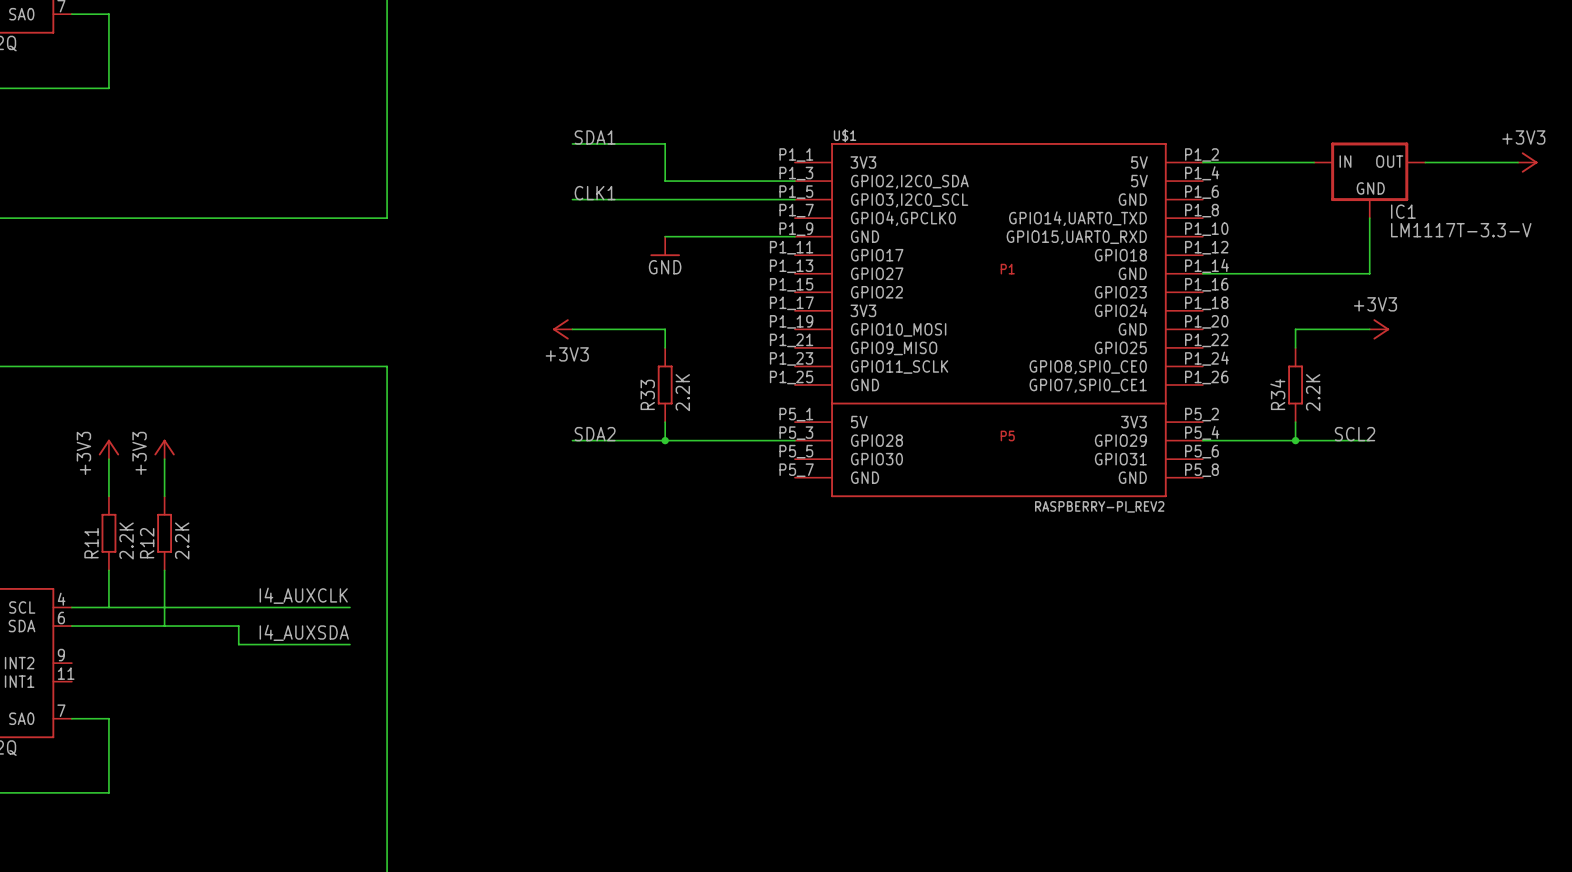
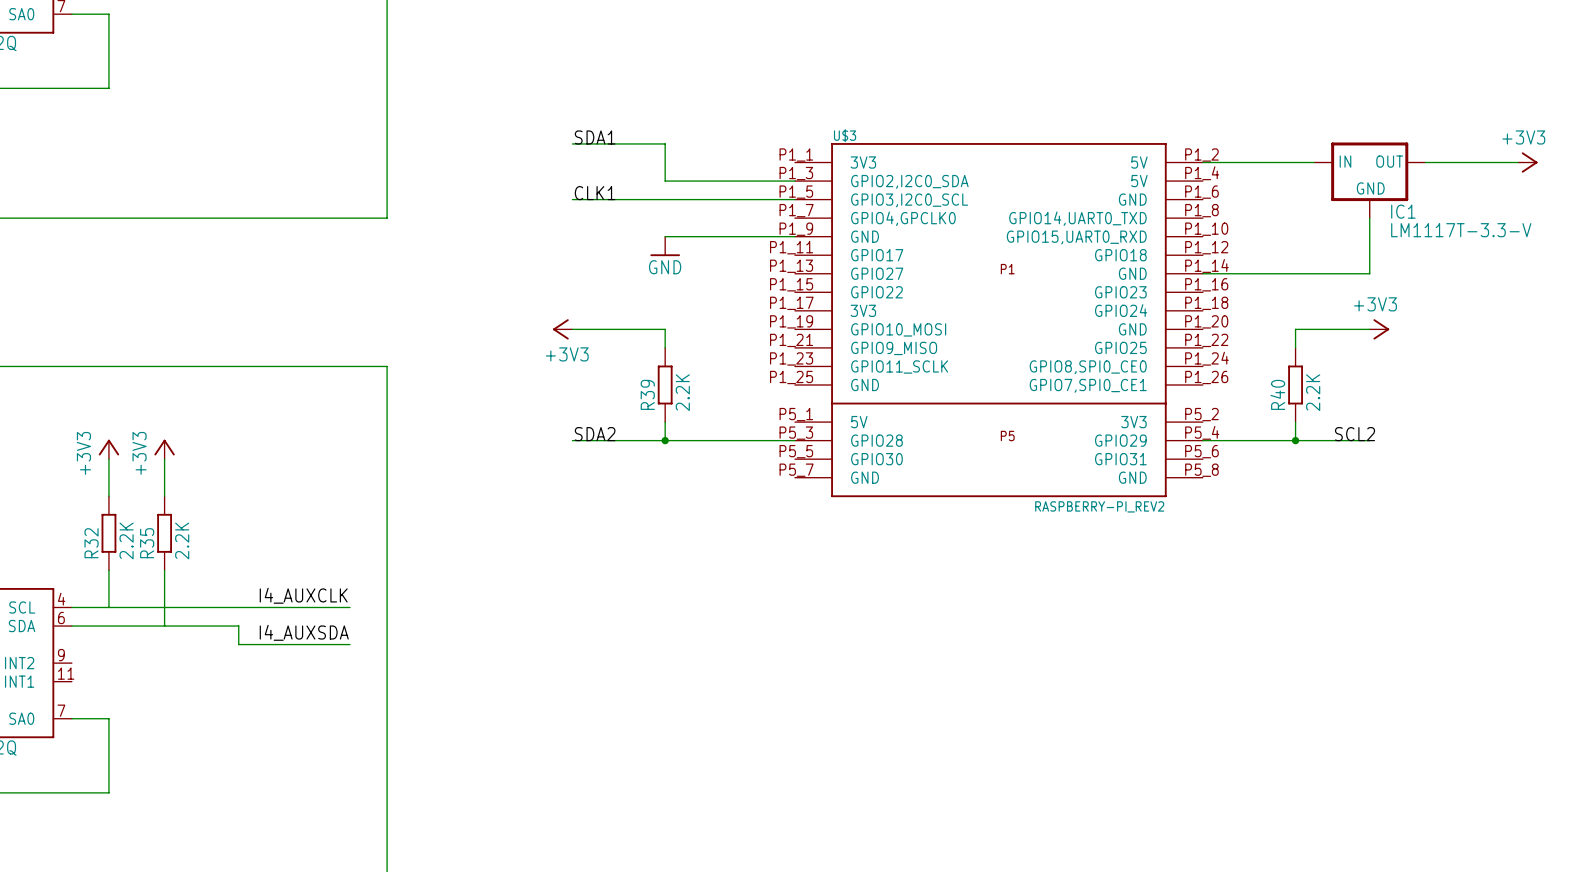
U$1 name: U$1 (845, 135) -> U$3 (845, 135)
R33 name: R33 (647, 394) -> R39 (647, 394)
R34 name: R34 (1277, 394) -> R40 (1277, 394)
R11 name: R11 (91, 543) -> R32 (91, 543)
R12 name: R12 (147, 543) -> R35 (147, 543)

